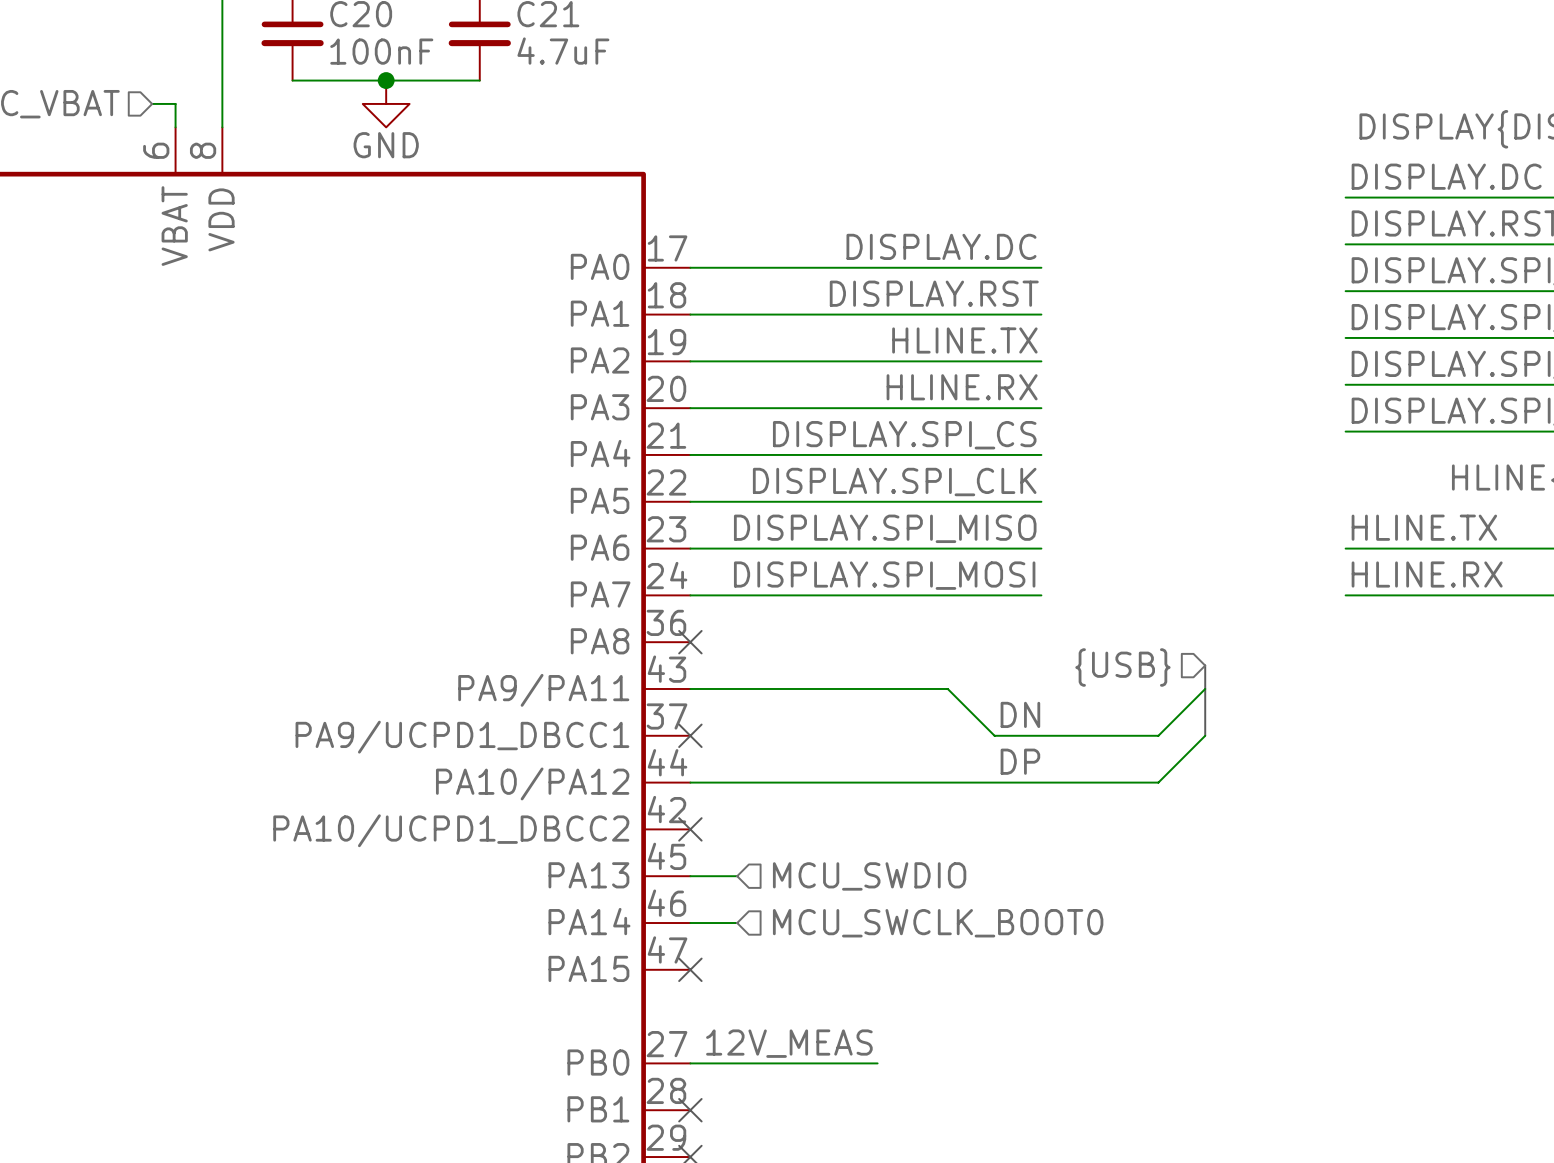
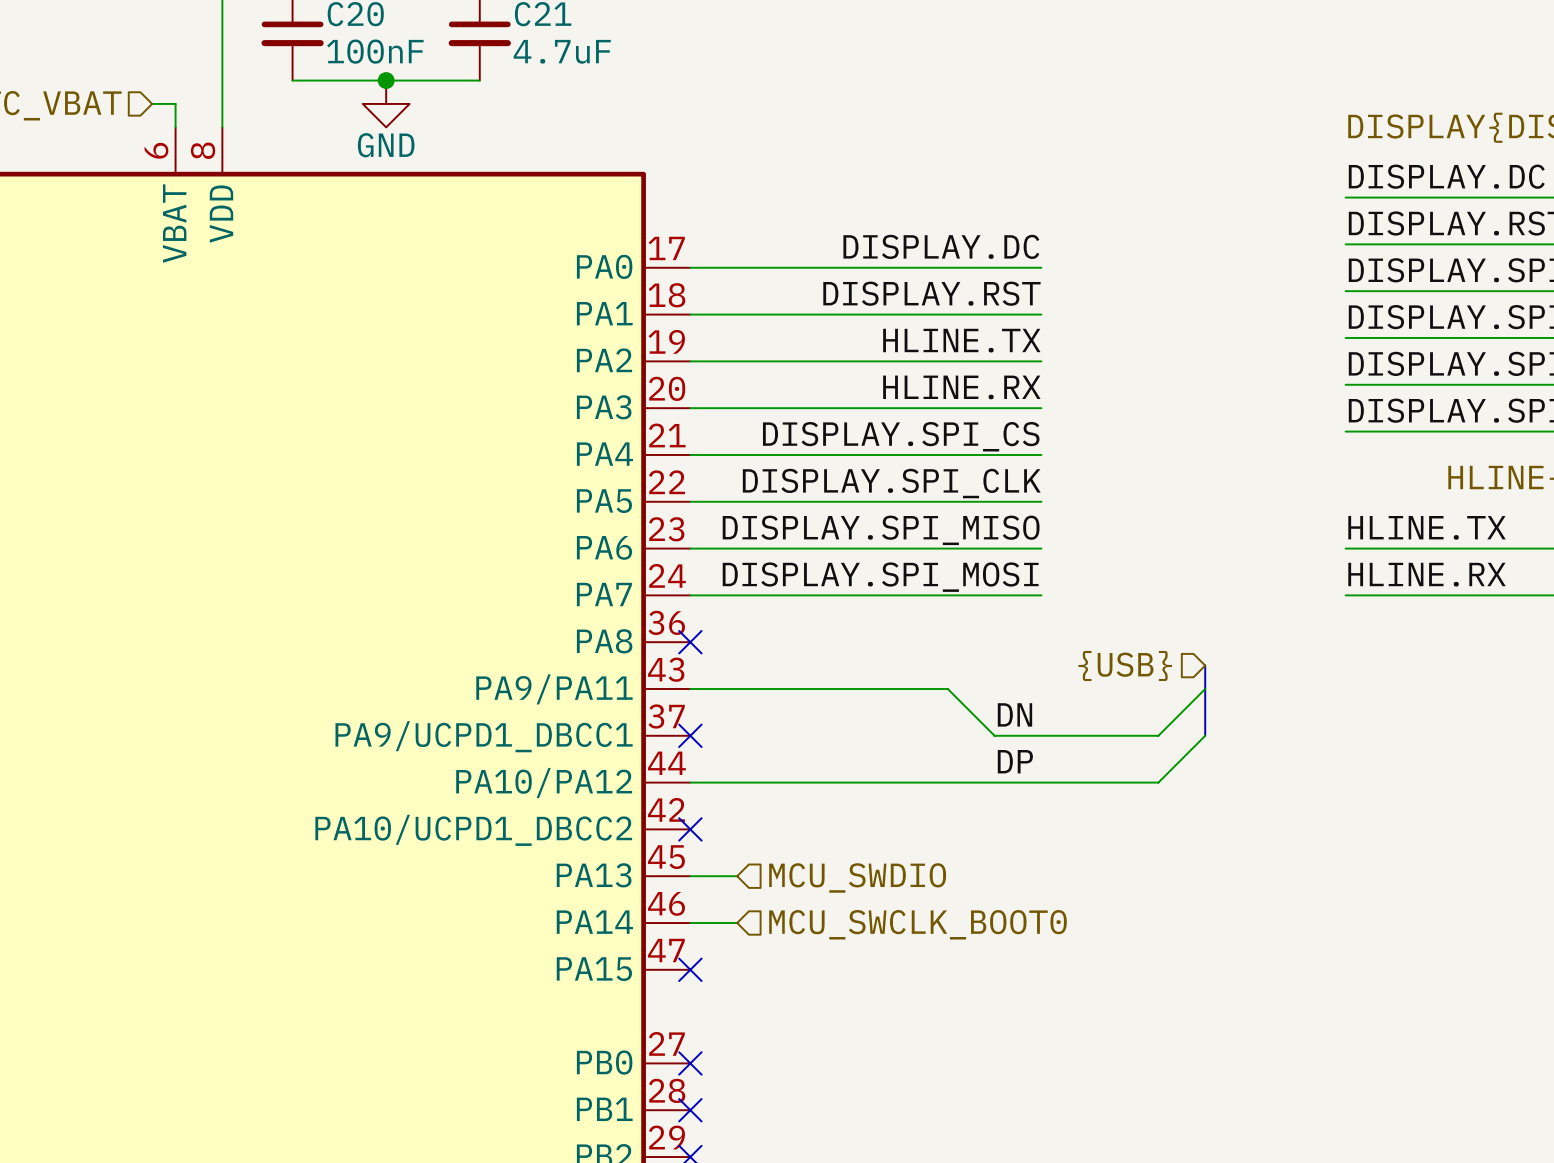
label: 12V_MEAS (789, 1043) -> none
wire: (690, 1063) (877, 1063) -> none
no-connect mark: none -> (690, 1063)

